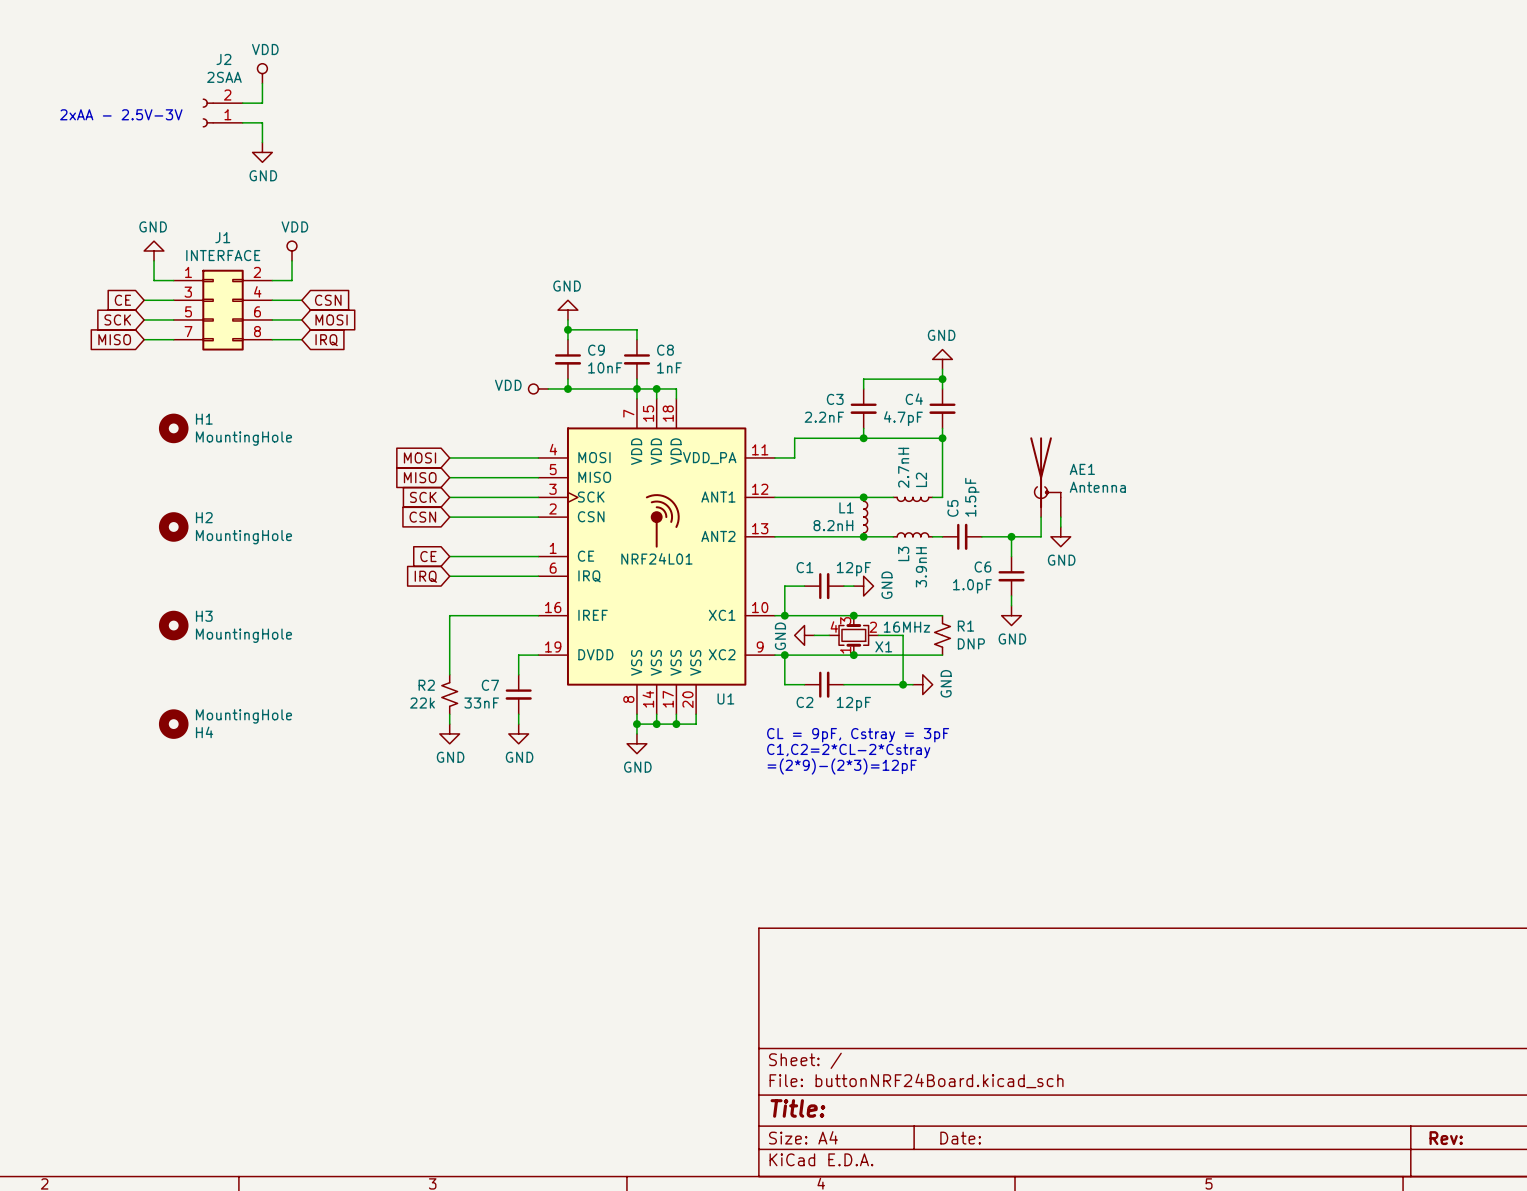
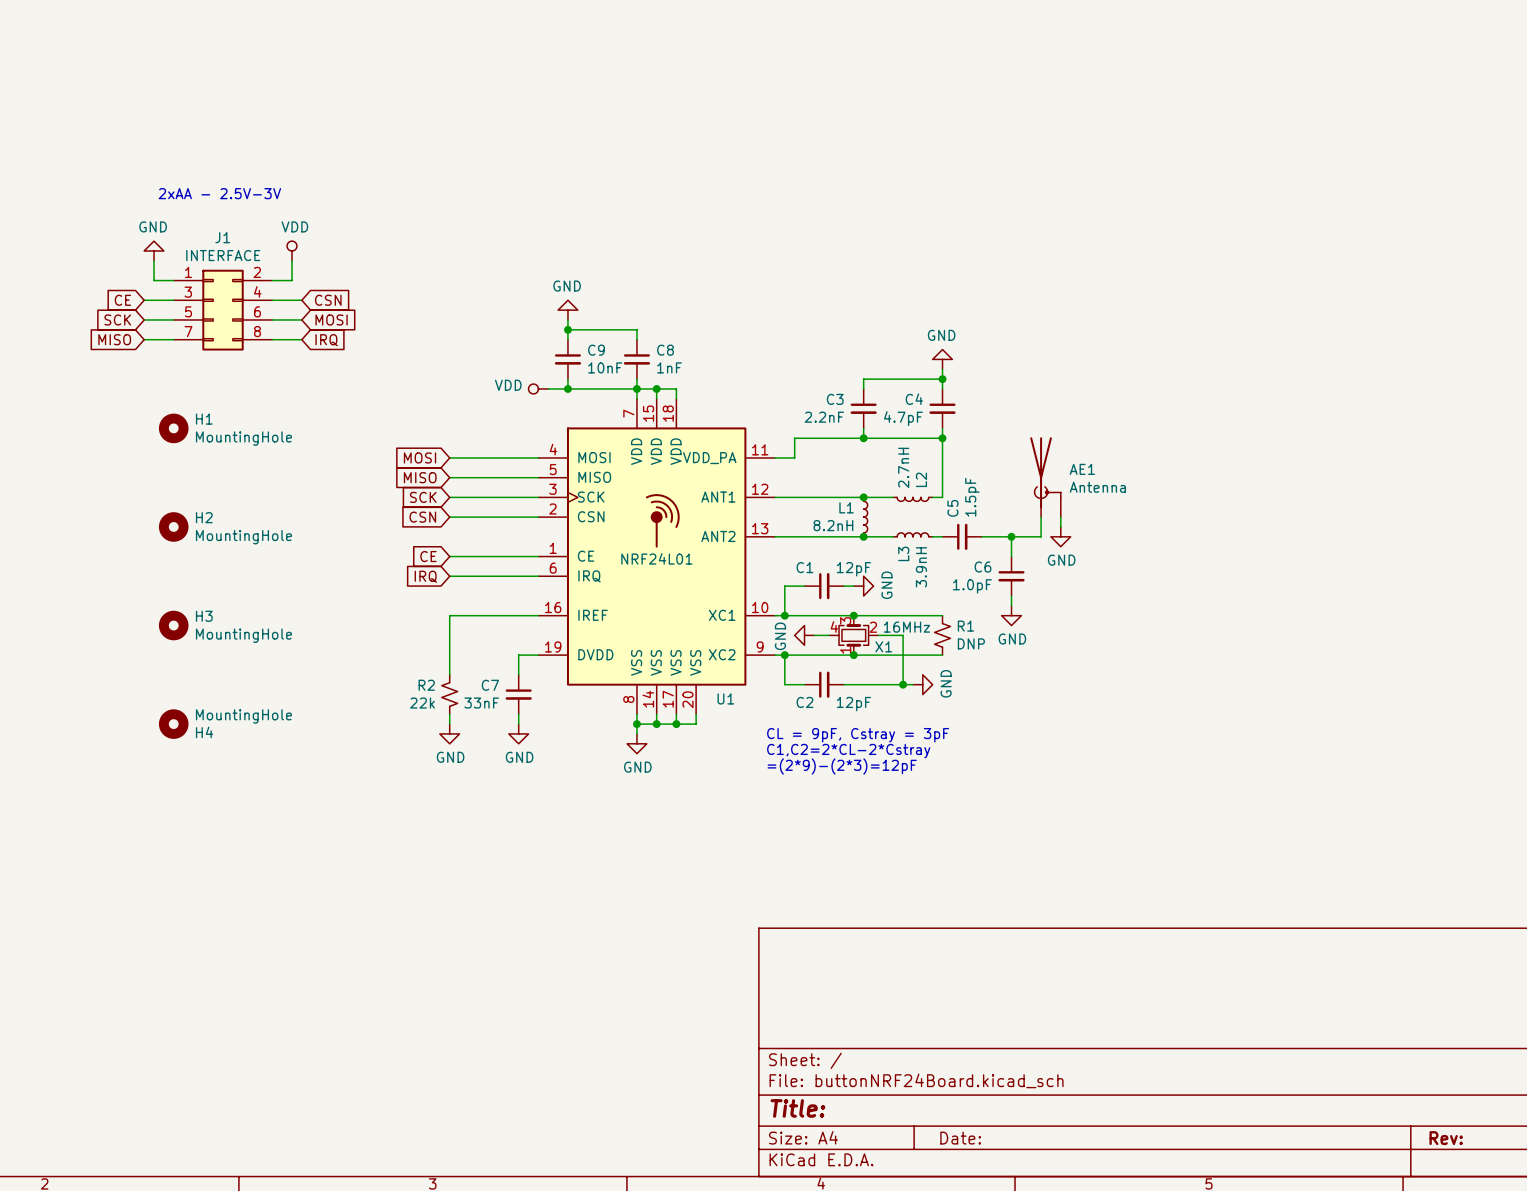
power symbol: VDD (262, 73) -> none
wire: (262, 83) (262, 103) (242, 103) -> none
J2: 2SAA (222, 113) -> none
text position: 2xAA - 2.5V-3V (121, 114) -> 2xAA - 2.5V-3V (219, 193)
wire: (242, 122) (262, 122) (262, 142) -> none
power symbol: GND (262, 152) -> none

